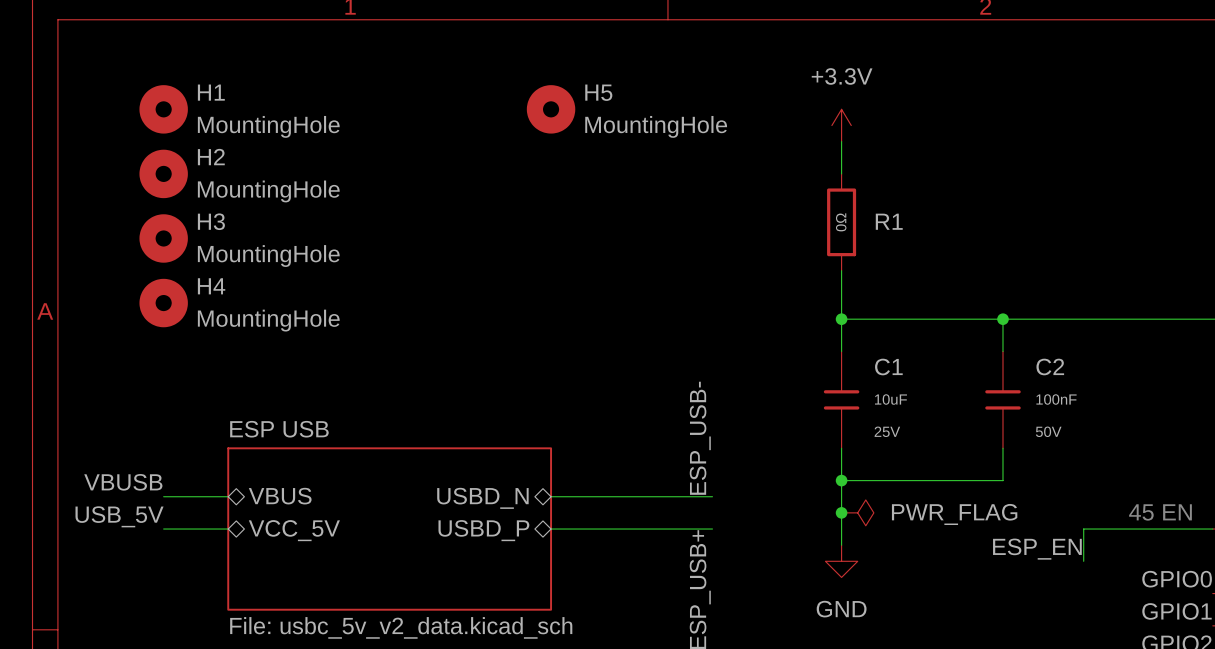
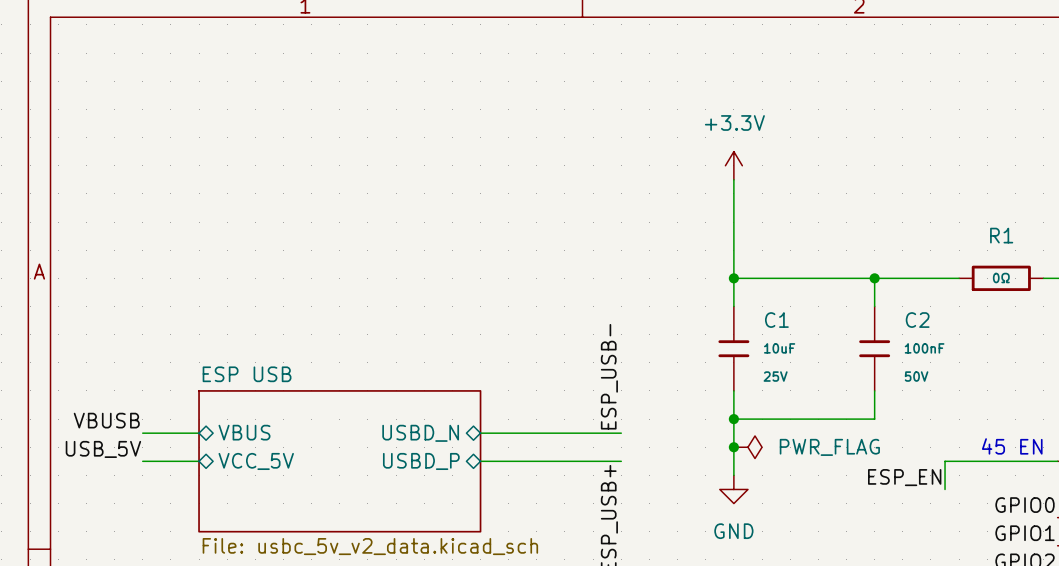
H1: MountingHole (163, 109) -> none
H5: MountingHole (551, 109) -> none
power symbol position: +3.3V (841, 125) -> +3.3V (733, 165)
wire: (841, 141) (841, 173) -> none
H2: MountingHole (163, 173) -> none
wire: none -> (733, 179) (733, 236)
R1 name position: R1 (889, 221) -> R1 (1001, 235)
R1 rotation: 0° (841, 222) -> 90° clockwise (1001, 278)
R1 position: (841, 222) -> (1001, 278)
H3: MountingHole (163, 238) -> none
H4: MountingHole (163, 303) -> none
wire: (1099, 319) (1196, 319) -> none

